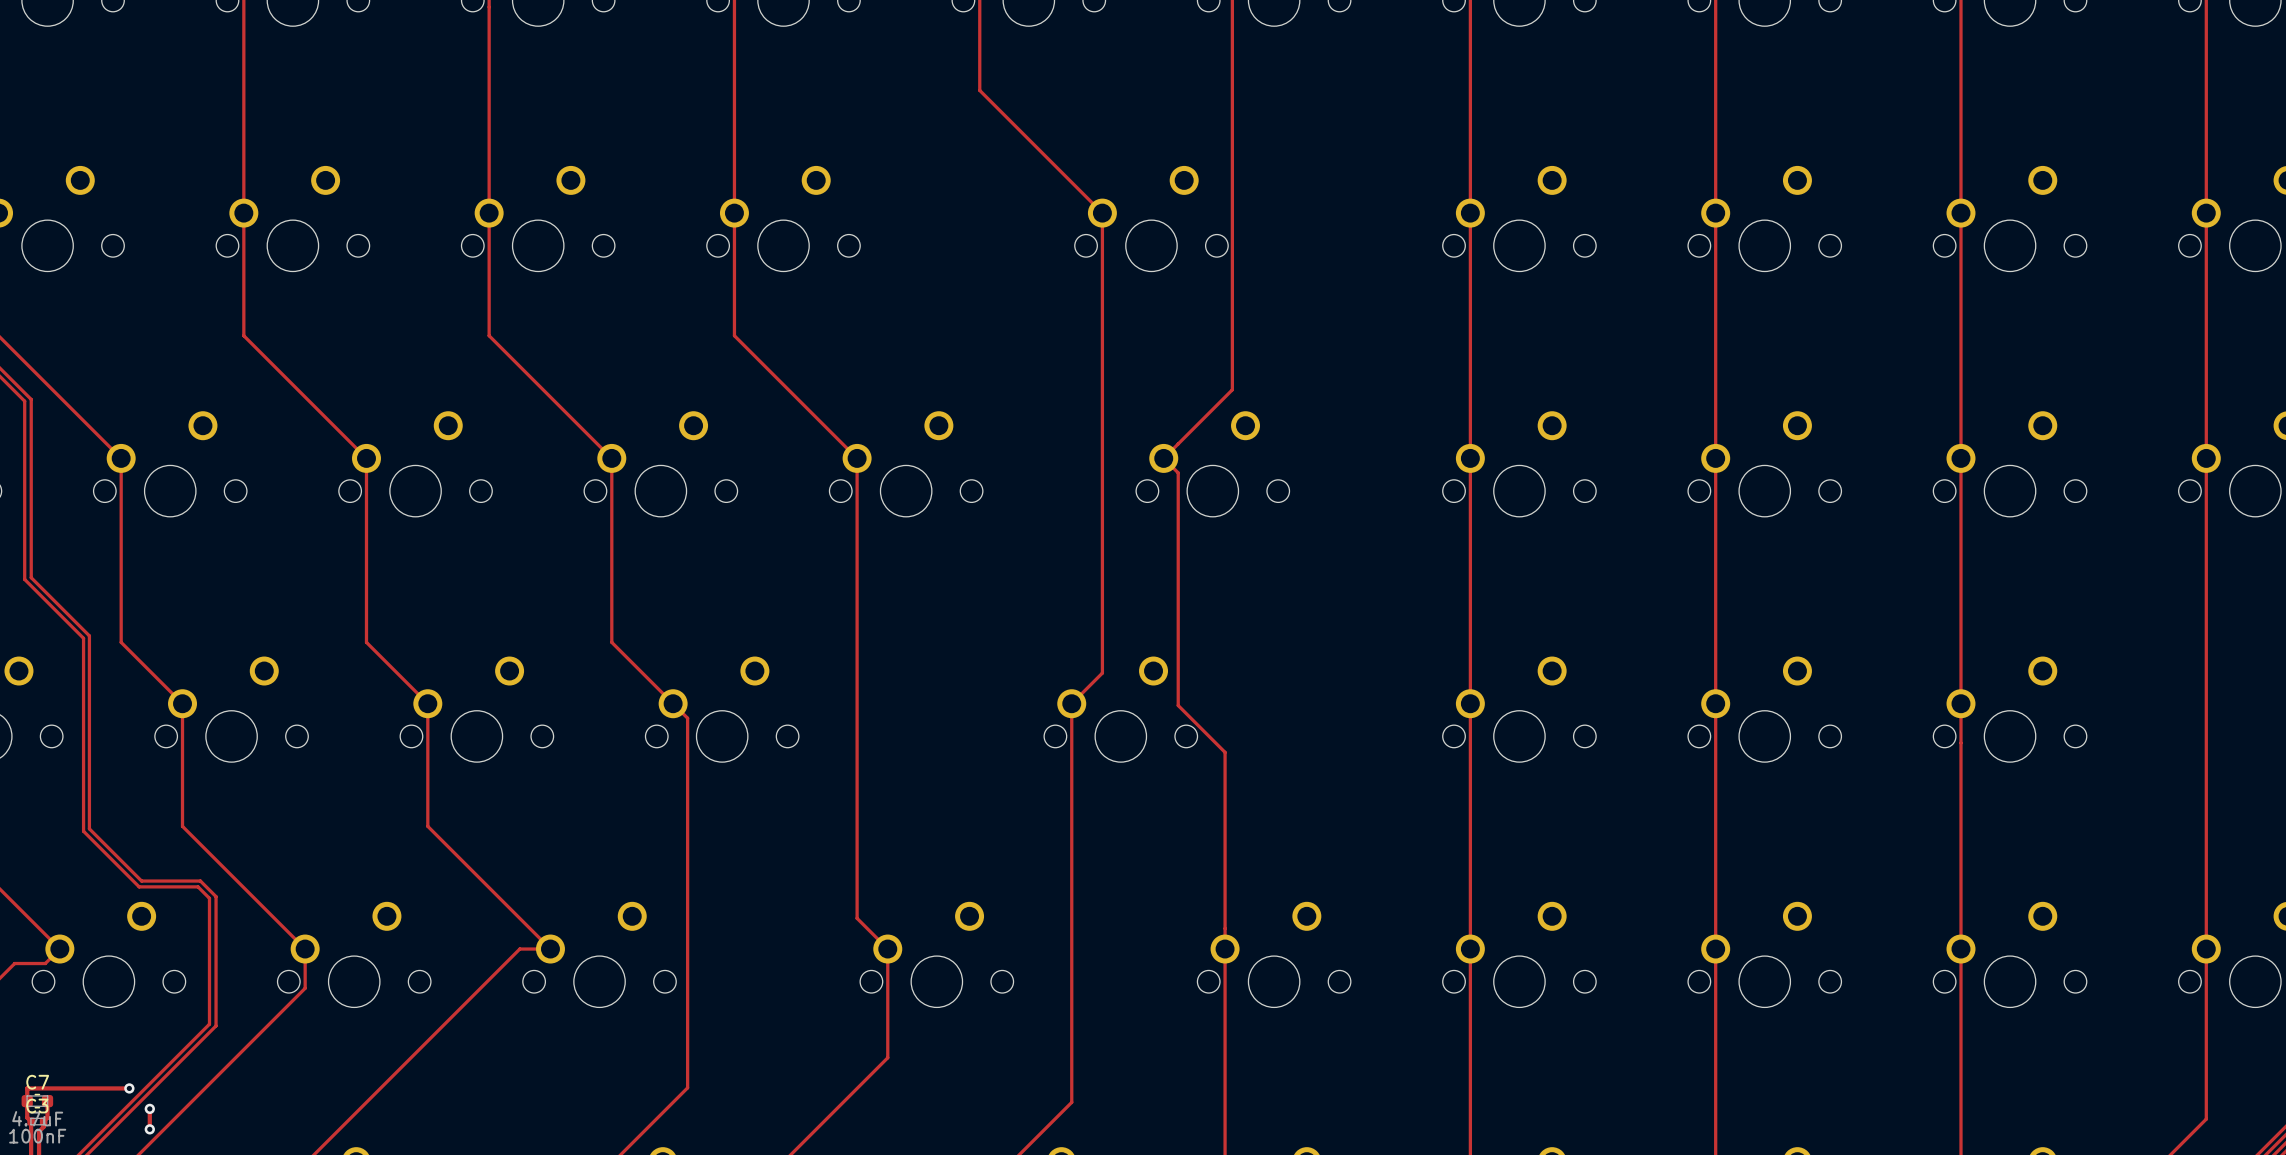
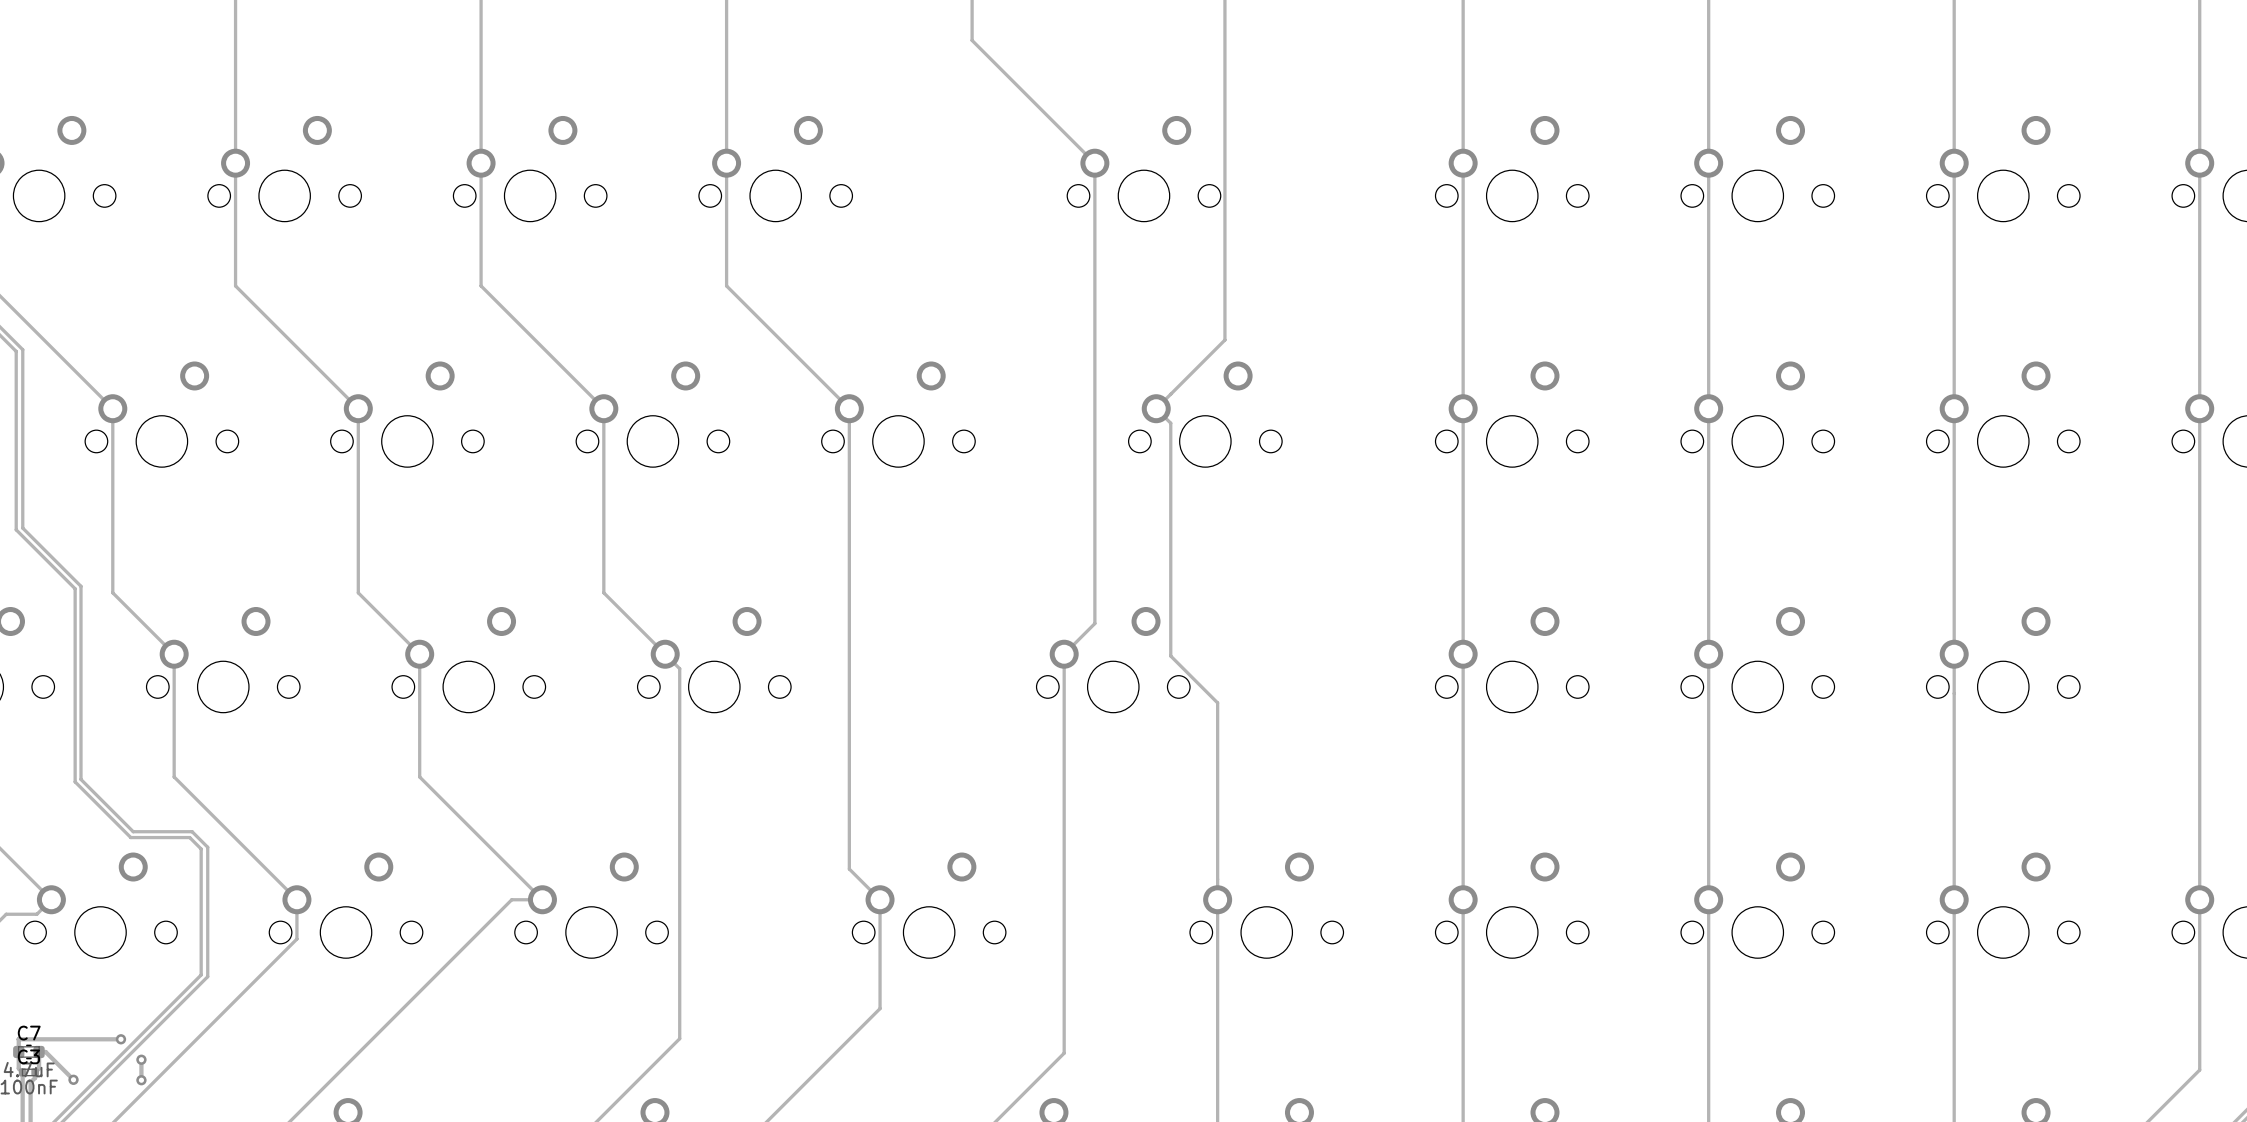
track: none -> (39, 1051) (45, 1051) (73, 1079)
via: none -> (73, 1079)

